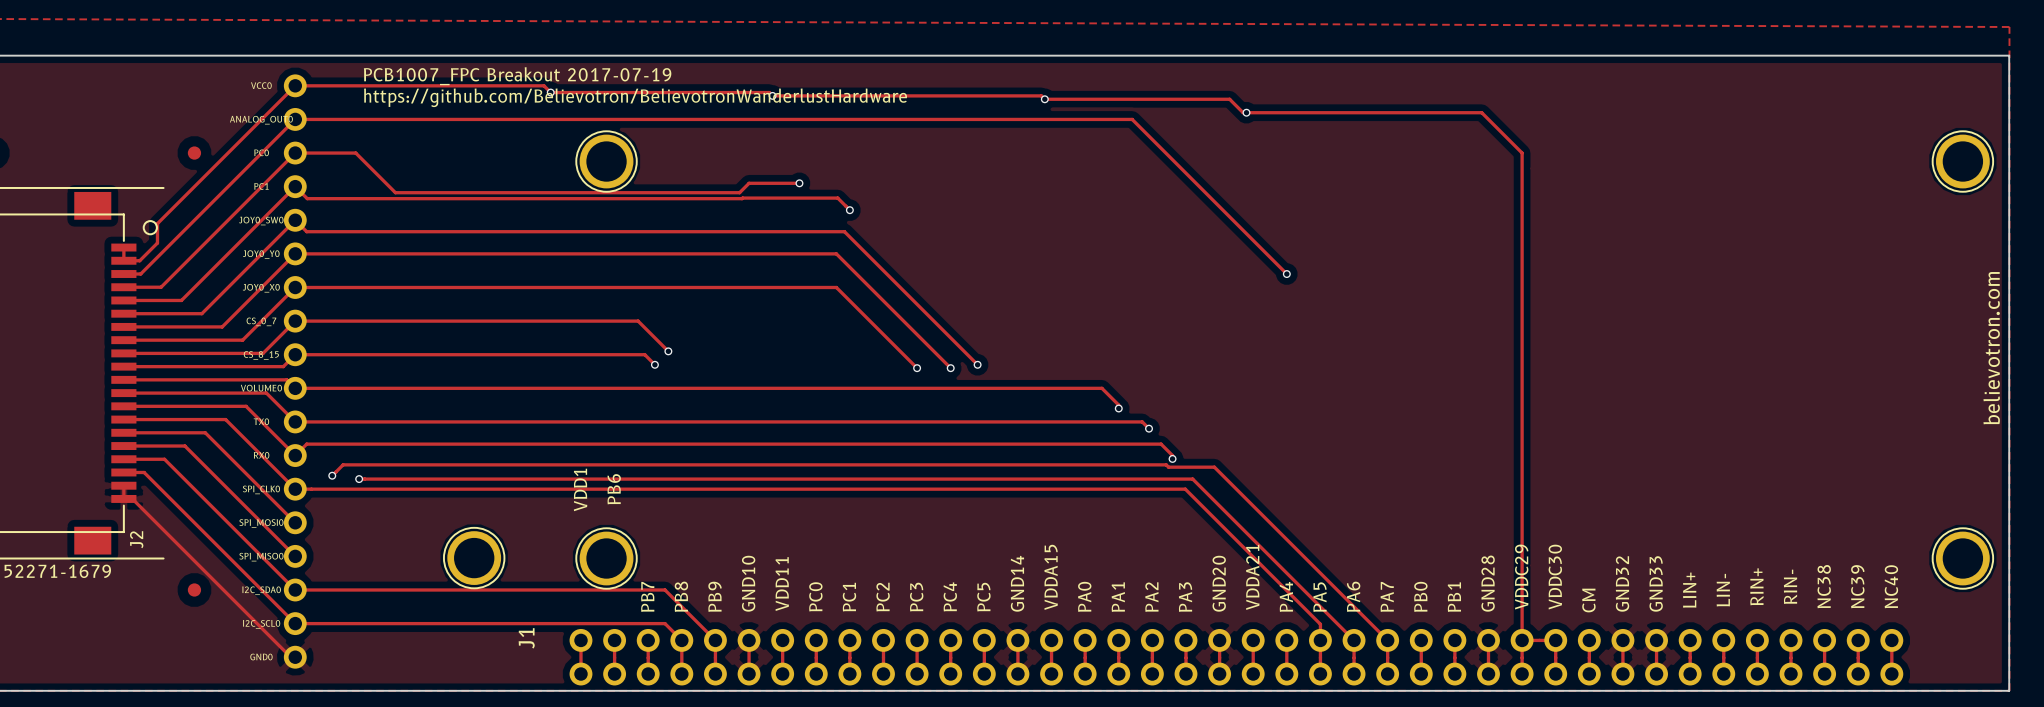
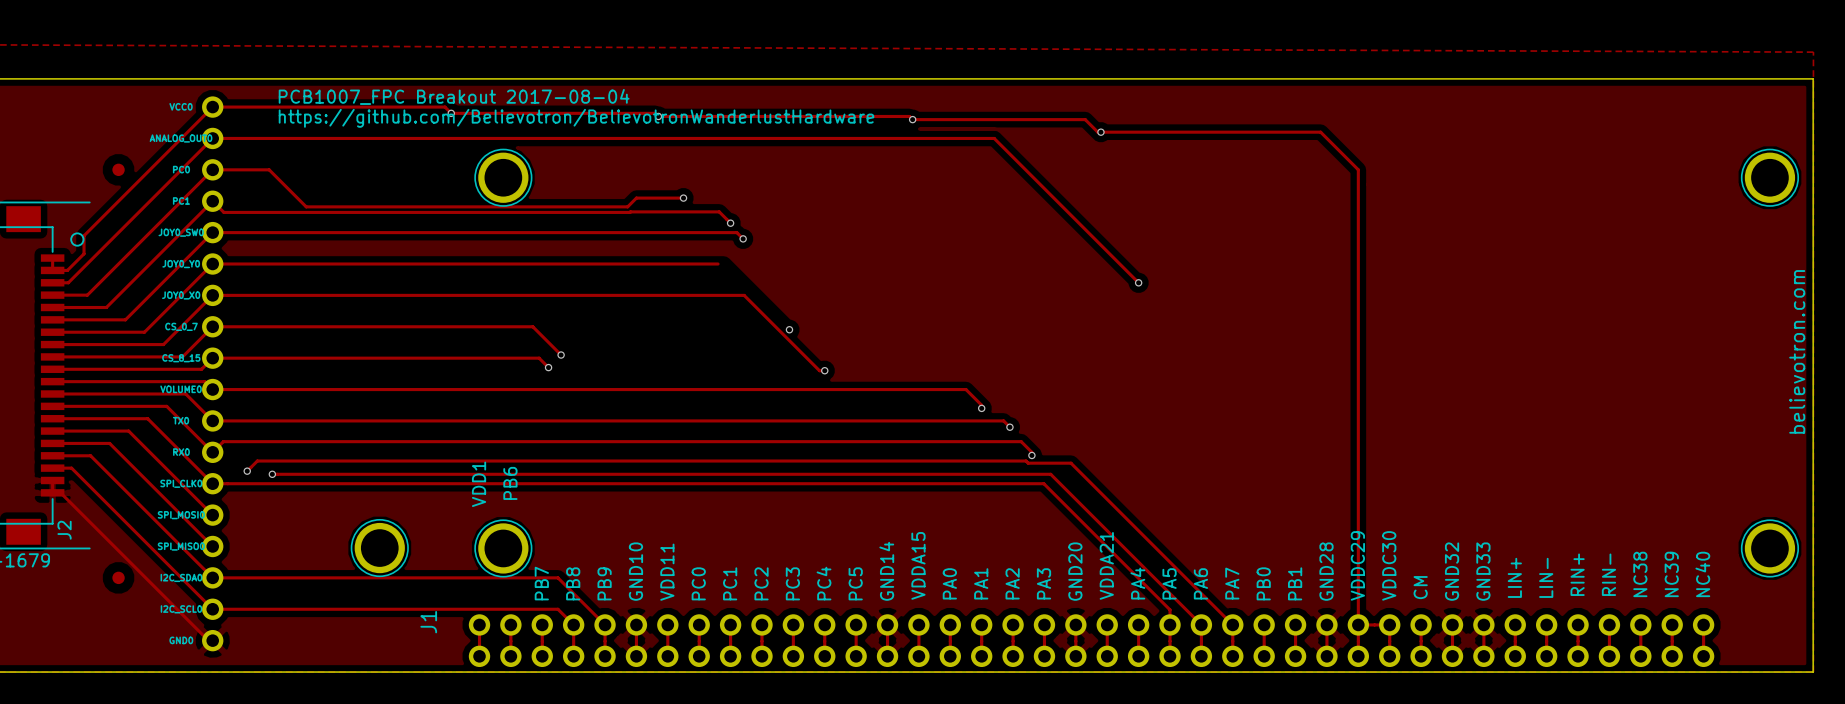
text: PCB1007_FPC Breakout 2017-07-19 (517, 76) -> PCB1007_FPC Breakout 2017-08-04 (454, 96)
track: (295, 220) (306, 231) (844, 231) (977, 364) -> (212, 232) (736, 232) (743, 238)
via: none -> (743, 238)
track: (836, 253) (950, 368) -> (718, 295) (744, 295) (819, 370) (824, 370)
track: (836, 287) (917, 368) -> none
via: none -> (789, 329)
via: (977, 364) -> none
via: (917, 368) -> none

